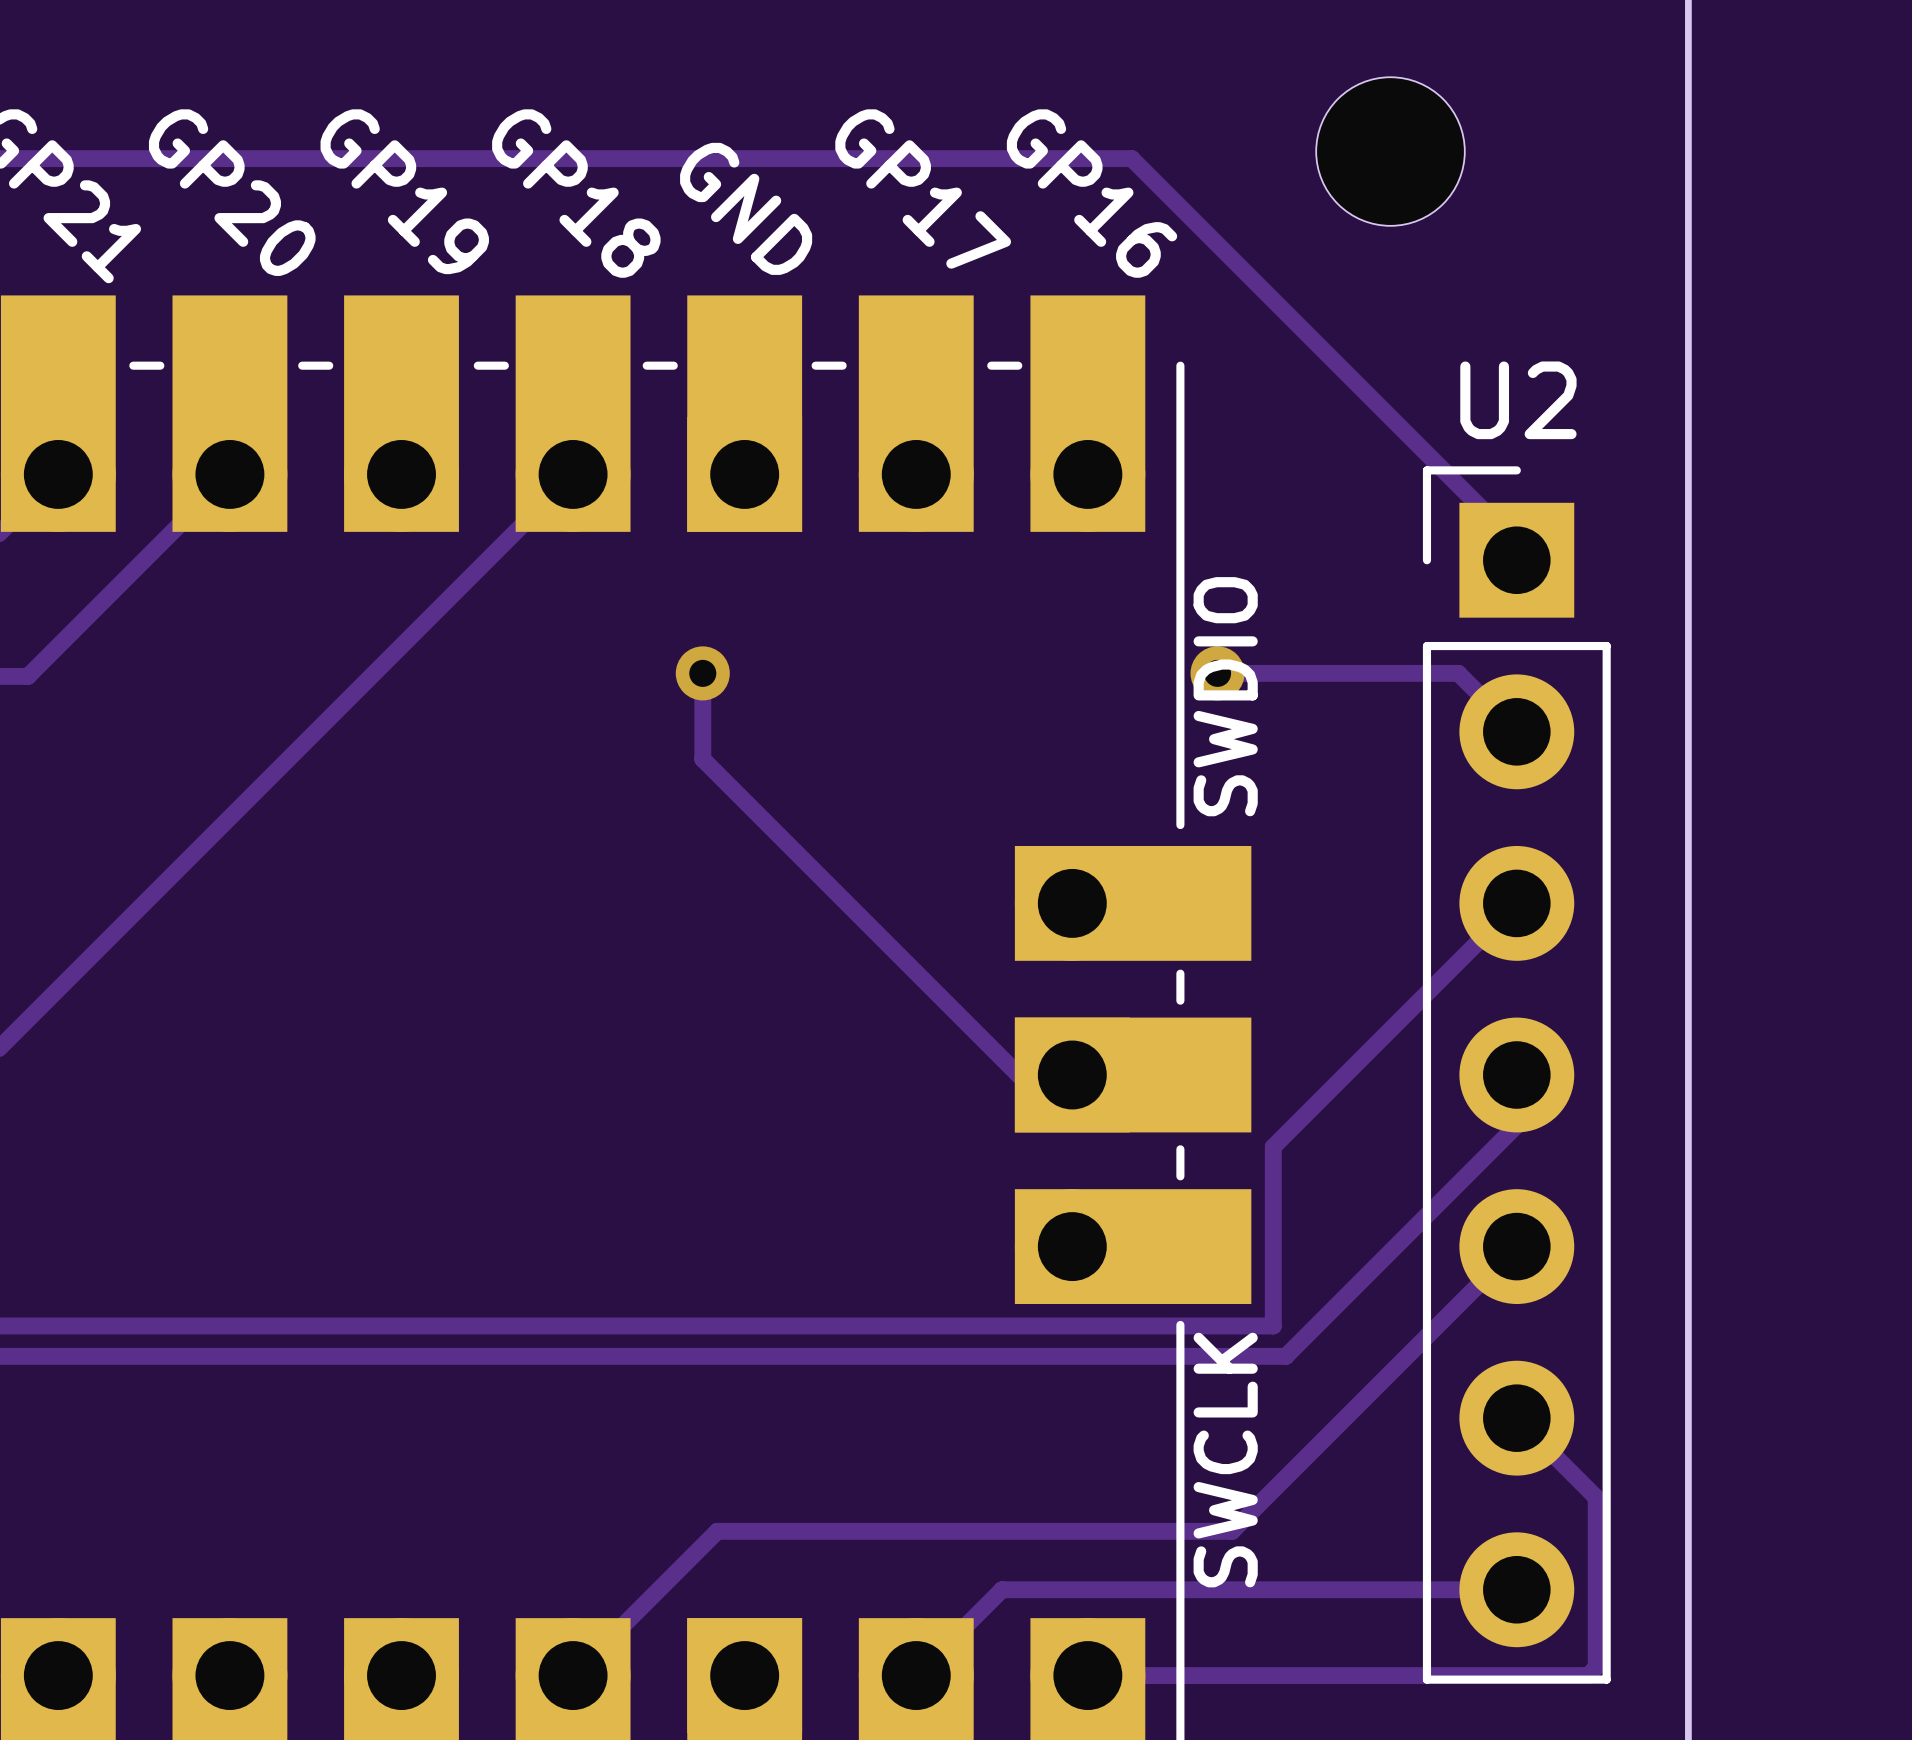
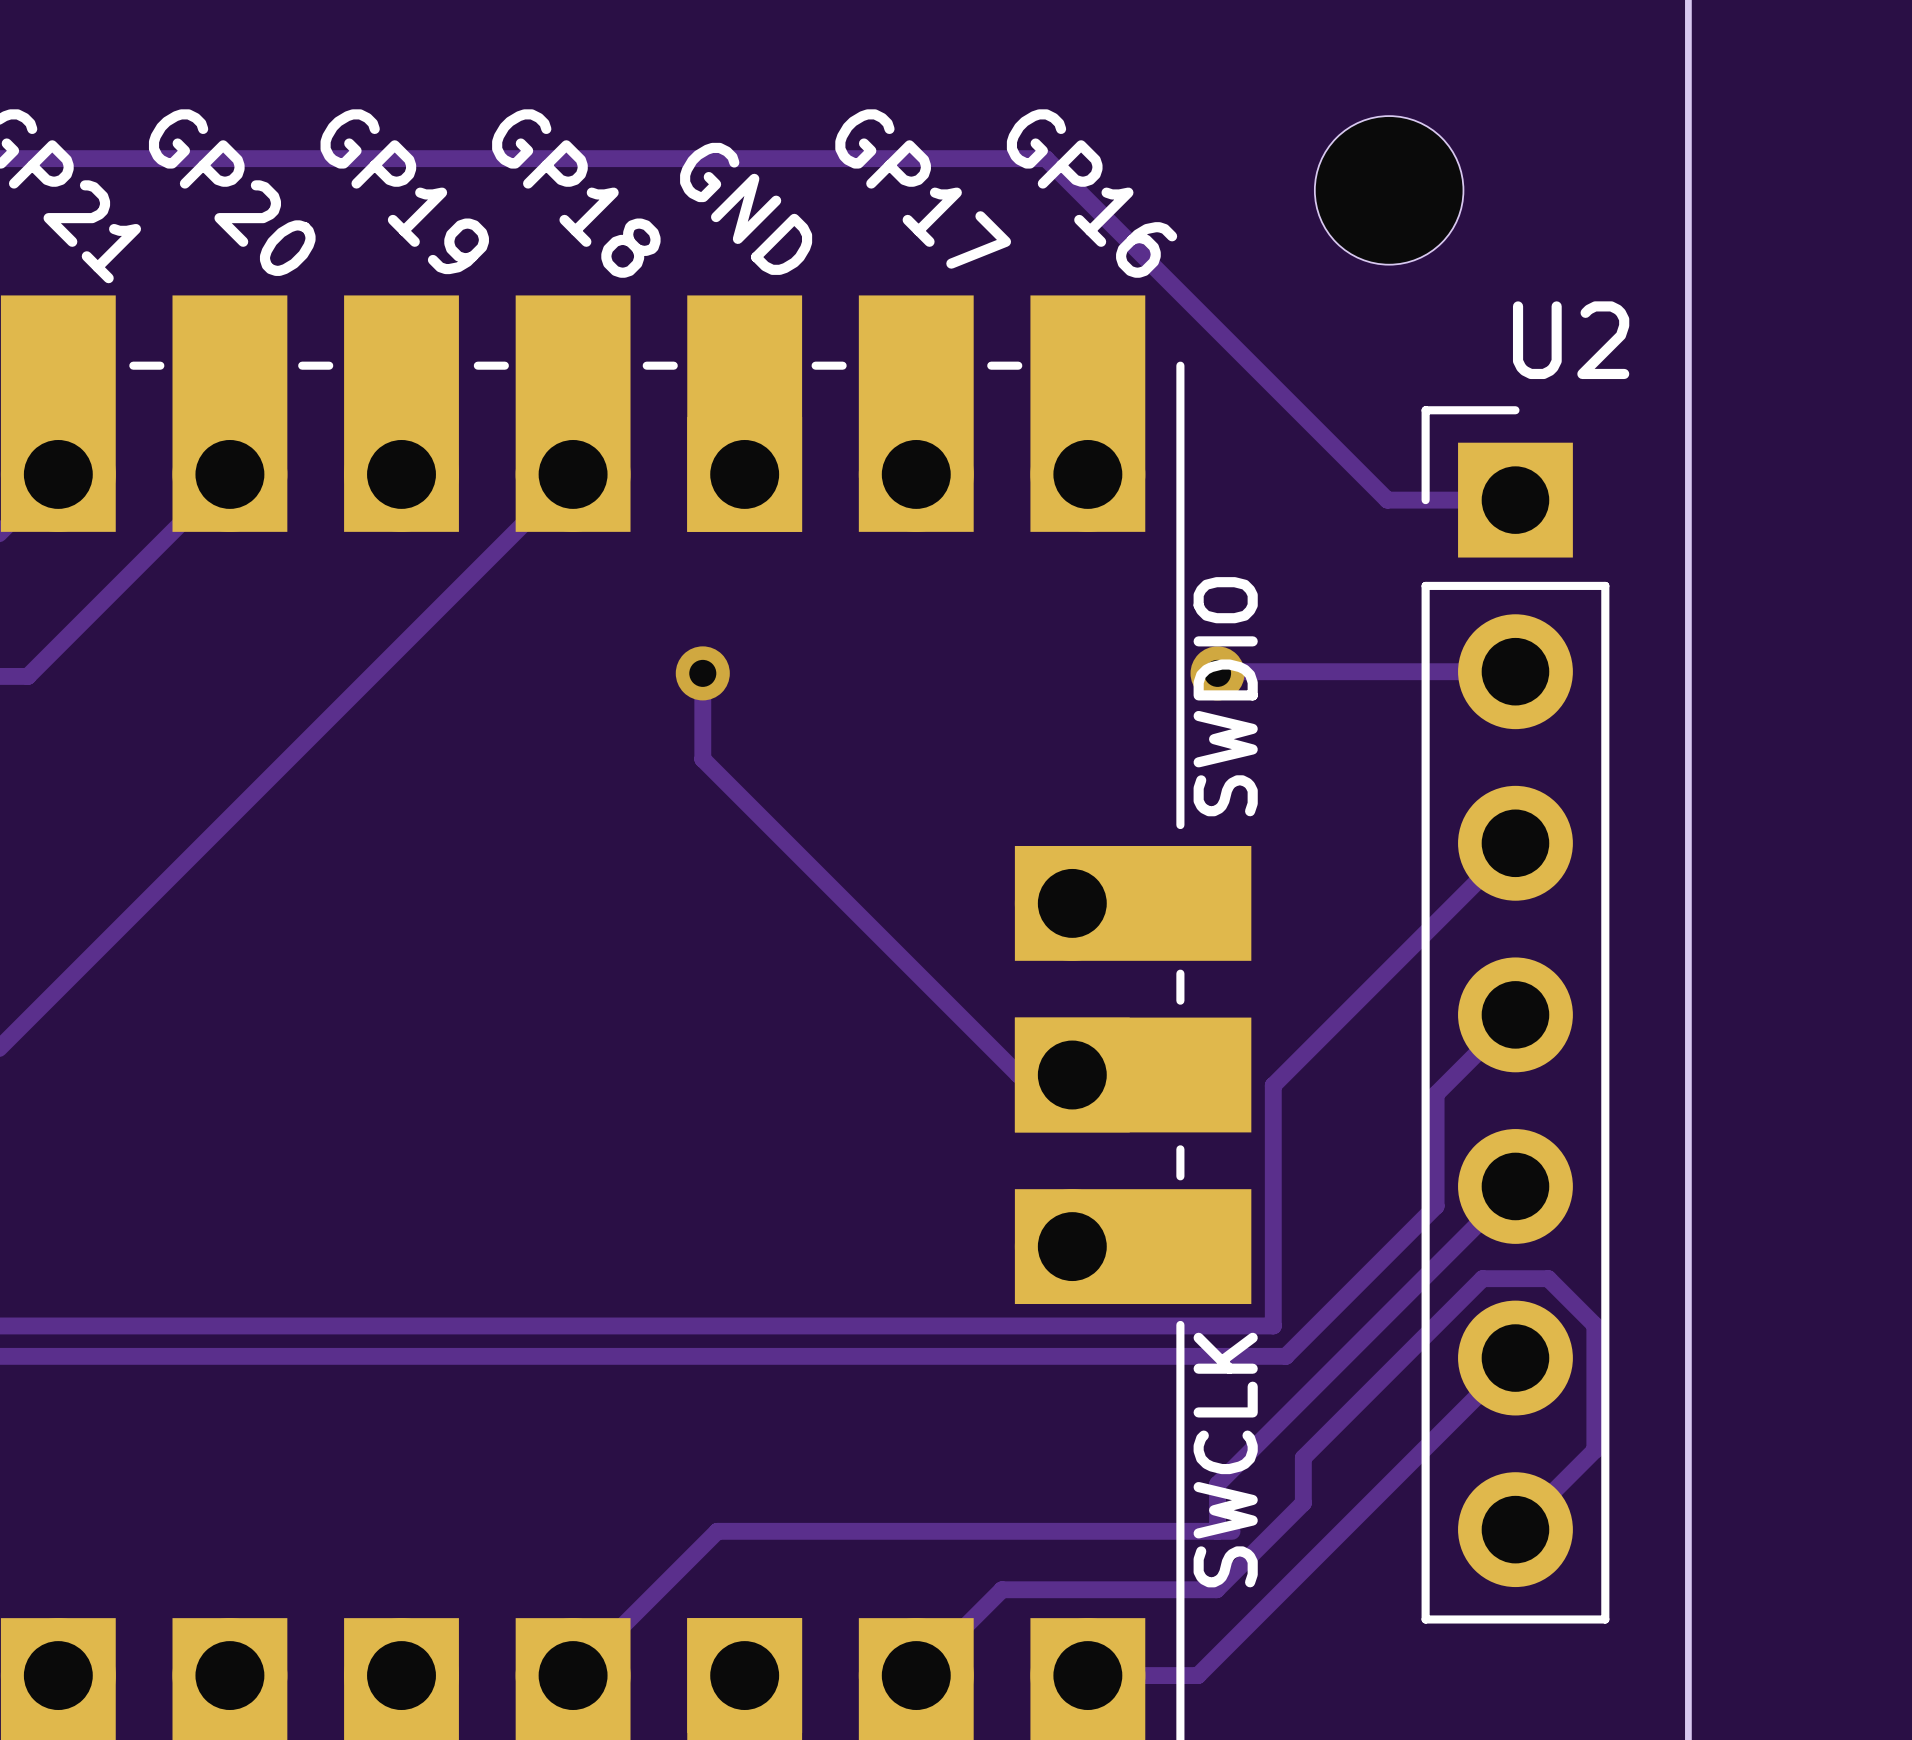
part position: (1390, 151) -> (1389, 190)
track: (1045, 158) (1131, 158) (1516, 543) (1516, 560) -> (1045, 158) (1387, 500) (1515, 500)
U2 name position: U2 (1518, 400) -> U2 (1571, 340)
track: (1217, 673) (1458, 673) (1516, 731) -> (1217, 673) (1219, 671) (1515, 671)
track: (1516, 903) (1273, 1146) -> (1515, 843) (1273, 1085) (1273, 1146)
track: (1516, 1075) (1516, 1125) (1436, 1206) -> (1515, 1014) (1436, 1094) (1436, 1206)
U2 position: (1516, 1075) -> (1515, 1014)
track: none -> (1515, 1186) (1217, 1484) (1217, 1531)
track: (1516, 1246) (1232, 1531) -> none
track: (1516, 1418) (1596, 1497) (1596, 1667) (1588, 1675) (1197, 1675) -> (1515, 1358) (1197, 1675)
track: (1216, 1589) (1516, 1589) -> (1216, 1589) (1303, 1503) (1303, 1457) (1482, 1278) (1548, 1278) (1594, 1325) (1594, 1450) (1515, 1529)

